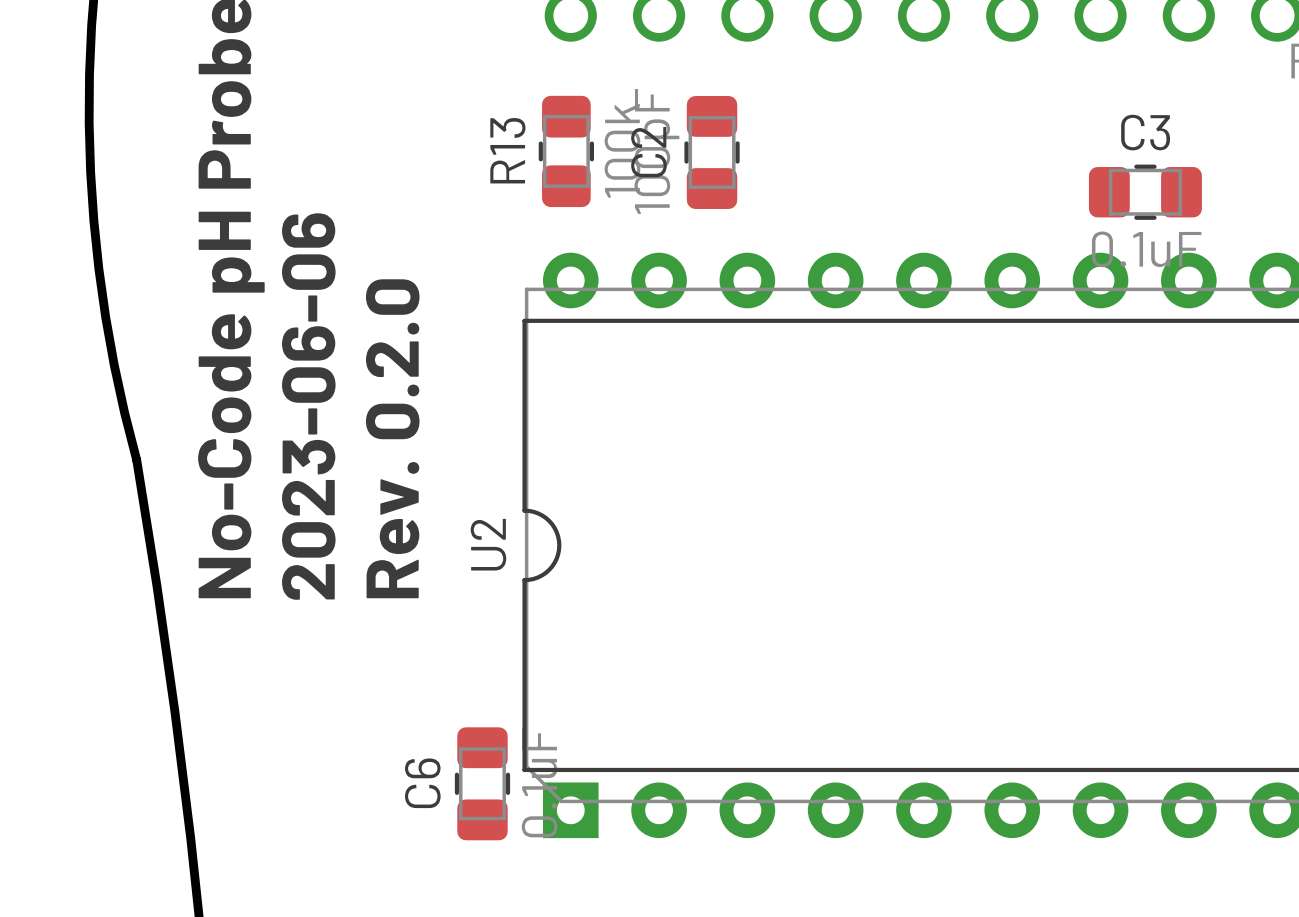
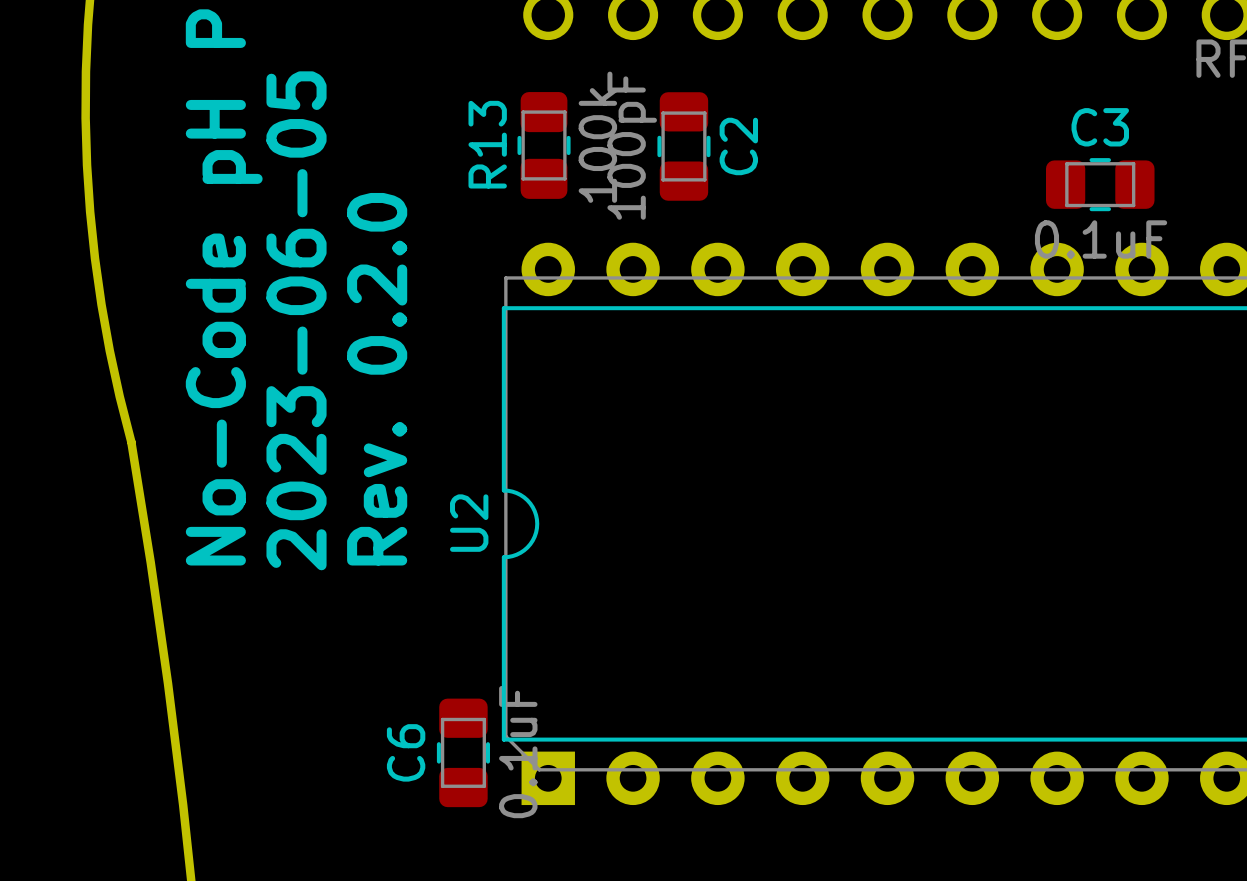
C2 name position: C2 (648, 152) -> C2 (738, 146)
text: 2023-06-06 (308, 406) -> 2023-06-05 (296, 320)

